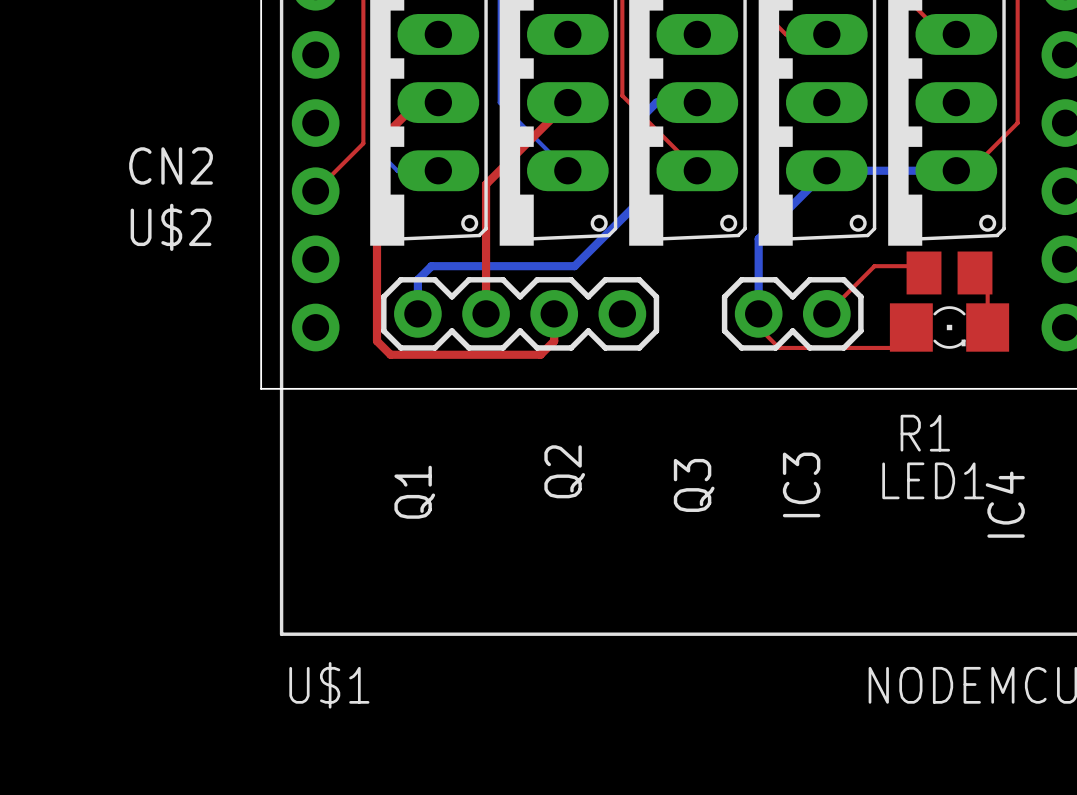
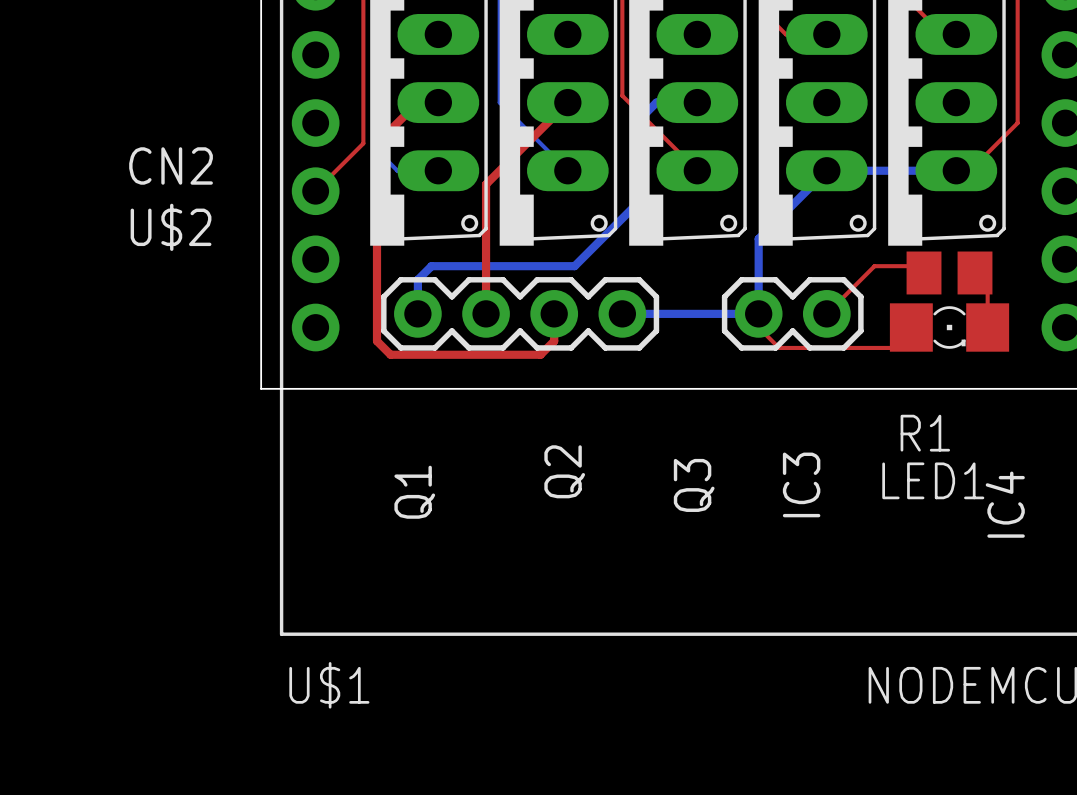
bottom track: none -> (622, 313) (758, 313)

